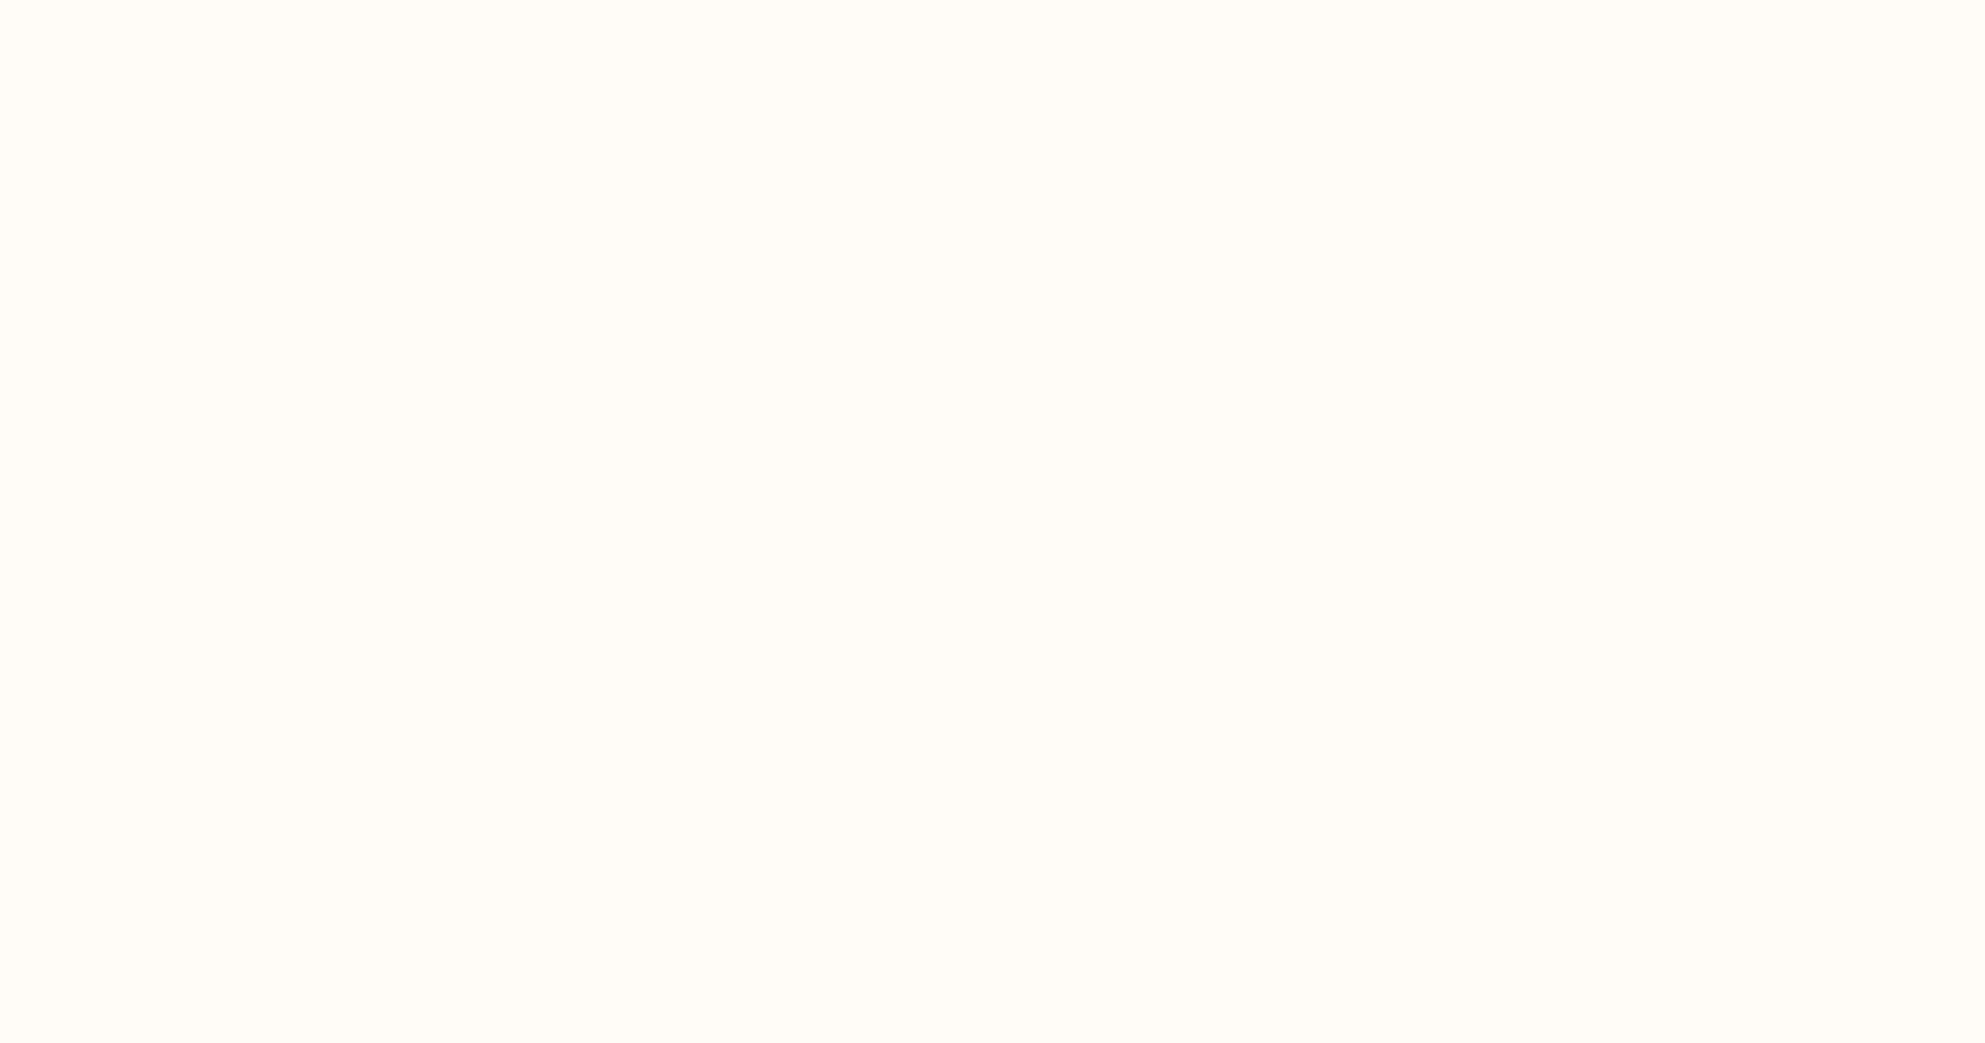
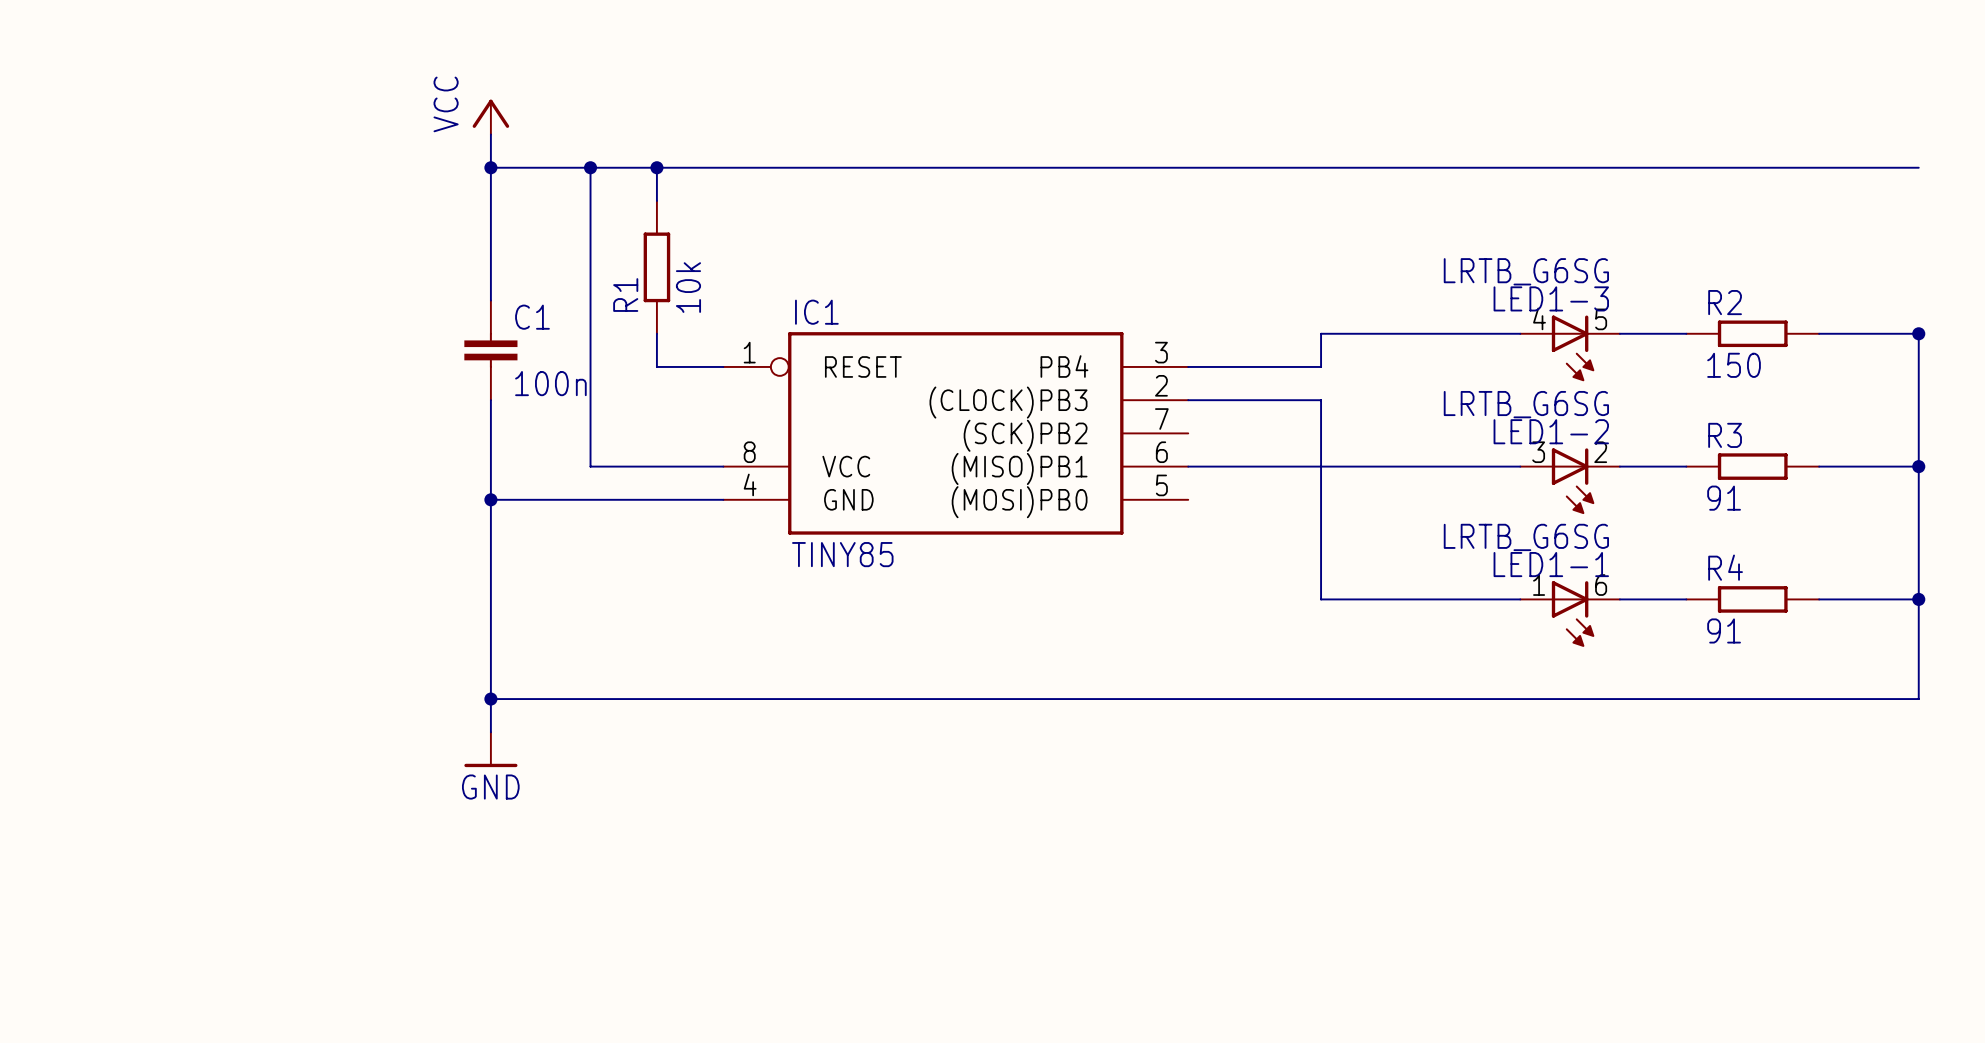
power symbol: none -> VCC (490, 117)
wire: none -> (490, 134) (490, 300)
wire: none -> (490, 167) (1918, 167)
junction: none -> (490, 167)
wire: none -> (590, 167) (590, 466) (723, 466)
junction: none -> (590, 167)
wire: none -> (656, 167) (656, 200)
junction: none -> (656, 167)
R1: none -> 10k (656, 267)
wire: none -> (656, 333) (656, 366) (723, 366)
wire: none -> (1520, 333) (1321, 333) (1321, 366) (1188, 366)
wire: none -> (1619, 333) (1686, 333)
R2: none -> 150 (1752, 333)
wire: none -> (1819, 333) (1918, 333) (1918, 699) (490, 699)
junction: none -> (1918, 333)
LED1-3: none -> LRTB_G6SG (1570, 348)
C1: none -> 100n (490, 350)
wire: none -> (490, 400) (490, 732)
wire: none -> (1188, 400) (1321, 400) (1321, 599) (1520, 599)
IC1: none -> TINY85 (955, 433)
wire: none -> (1188, 466) (1520, 466)
wire: none -> (1619, 466) (1686, 466)
R3: none -> 91 (1752, 466)
wire: none -> (1819, 466) (1918, 466)
junction: none -> (1918, 466)
LED1-2: none -> LRTB_G6SG (1570, 481)
wire: none -> (490, 499) (723, 499)
junction: none -> (490, 499)
wire: none -> (1619, 599) (1686, 599)
R4: none -> 91 (1752, 599)
wire: none -> (1819, 599) (1918, 599)
junction: none -> (1918, 599)
LED1-1: none -> LRTB_G6SG (1570, 614)
junction: none -> (490, 699)
power symbol: none -> GND (490, 749)

